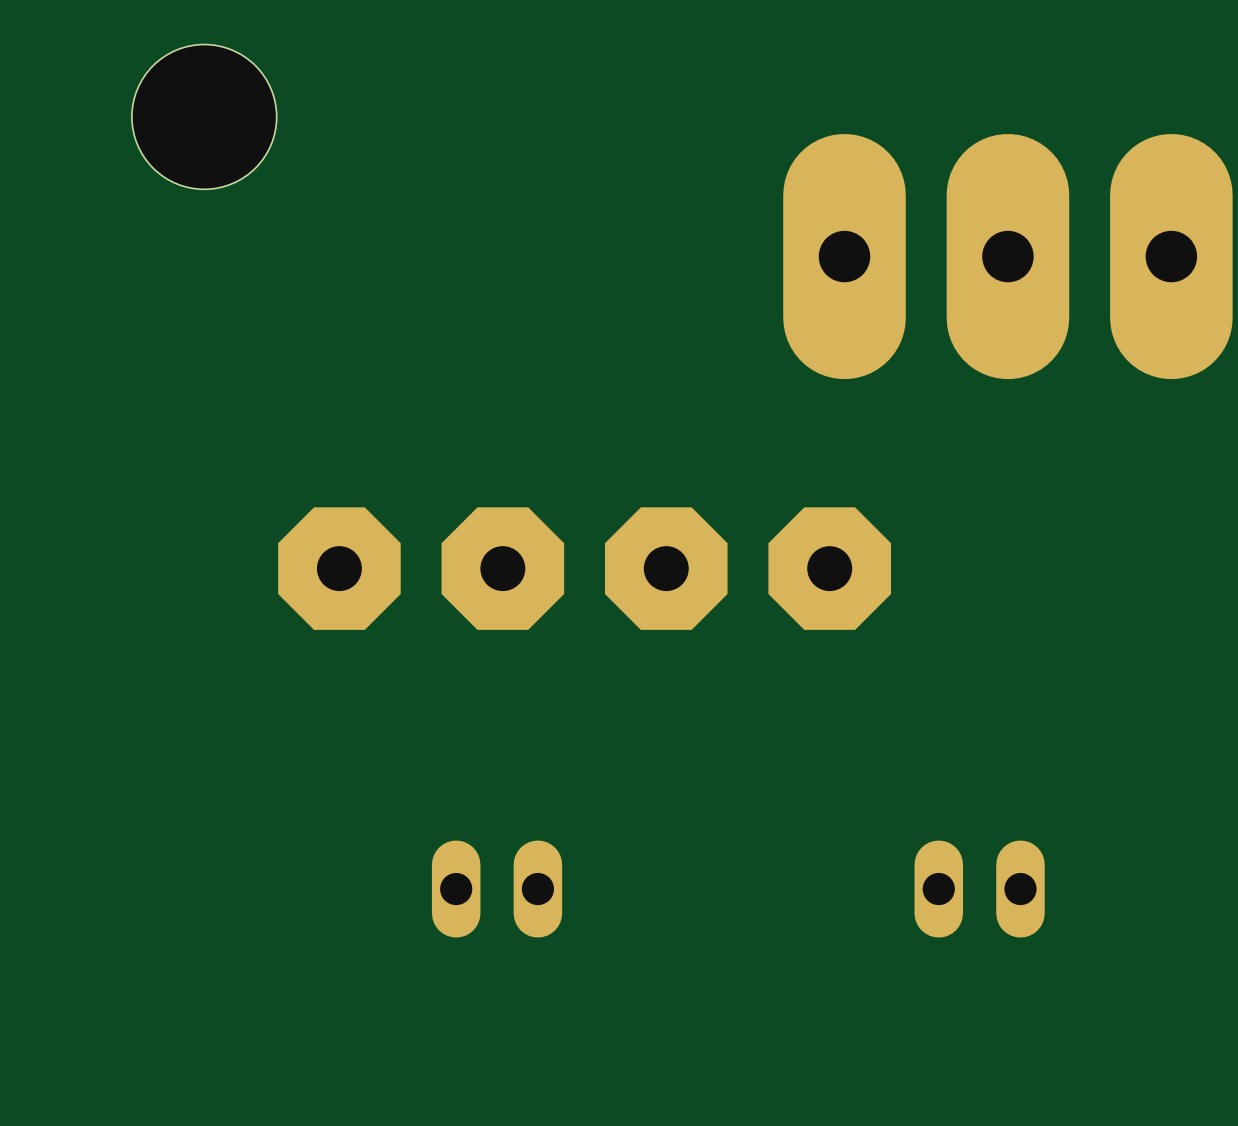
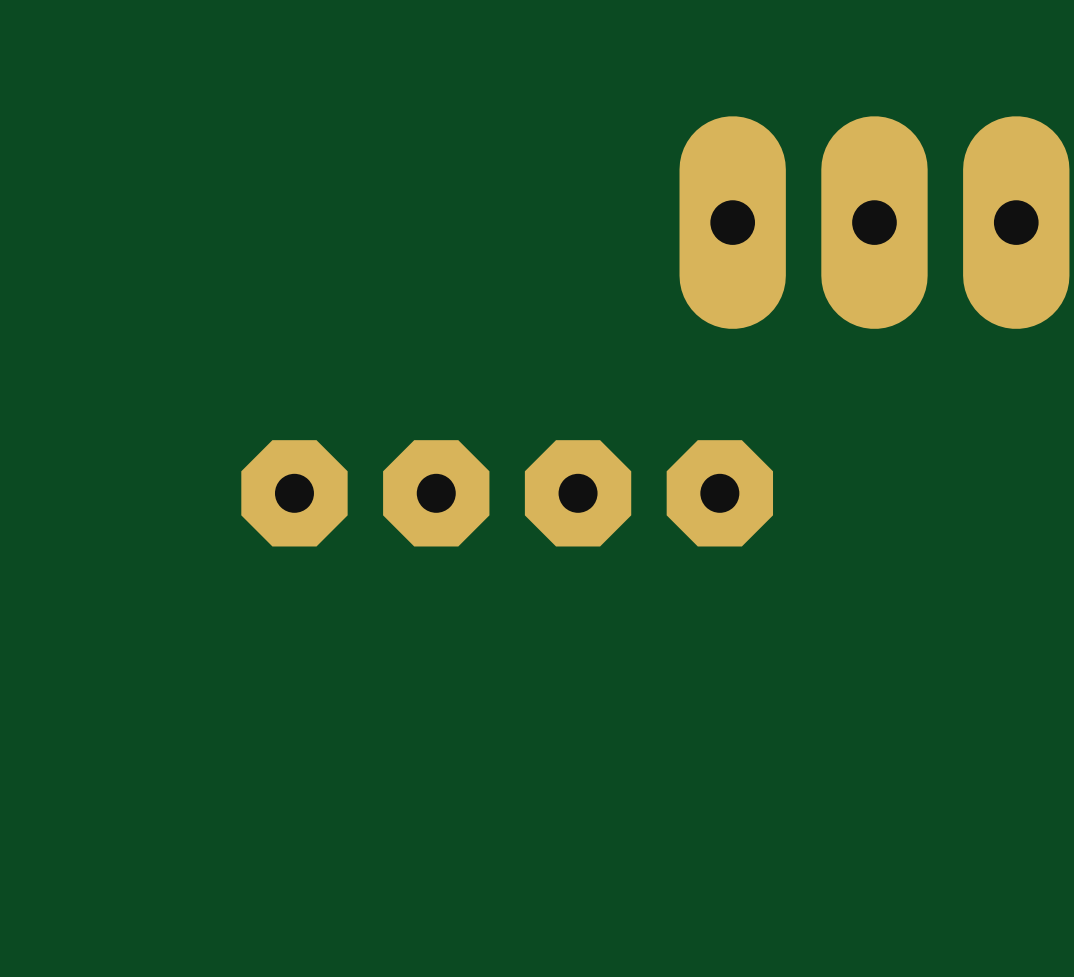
part: (204, 116) -> none
part: (497, 889) -> none
part: (979, 889) -> none

